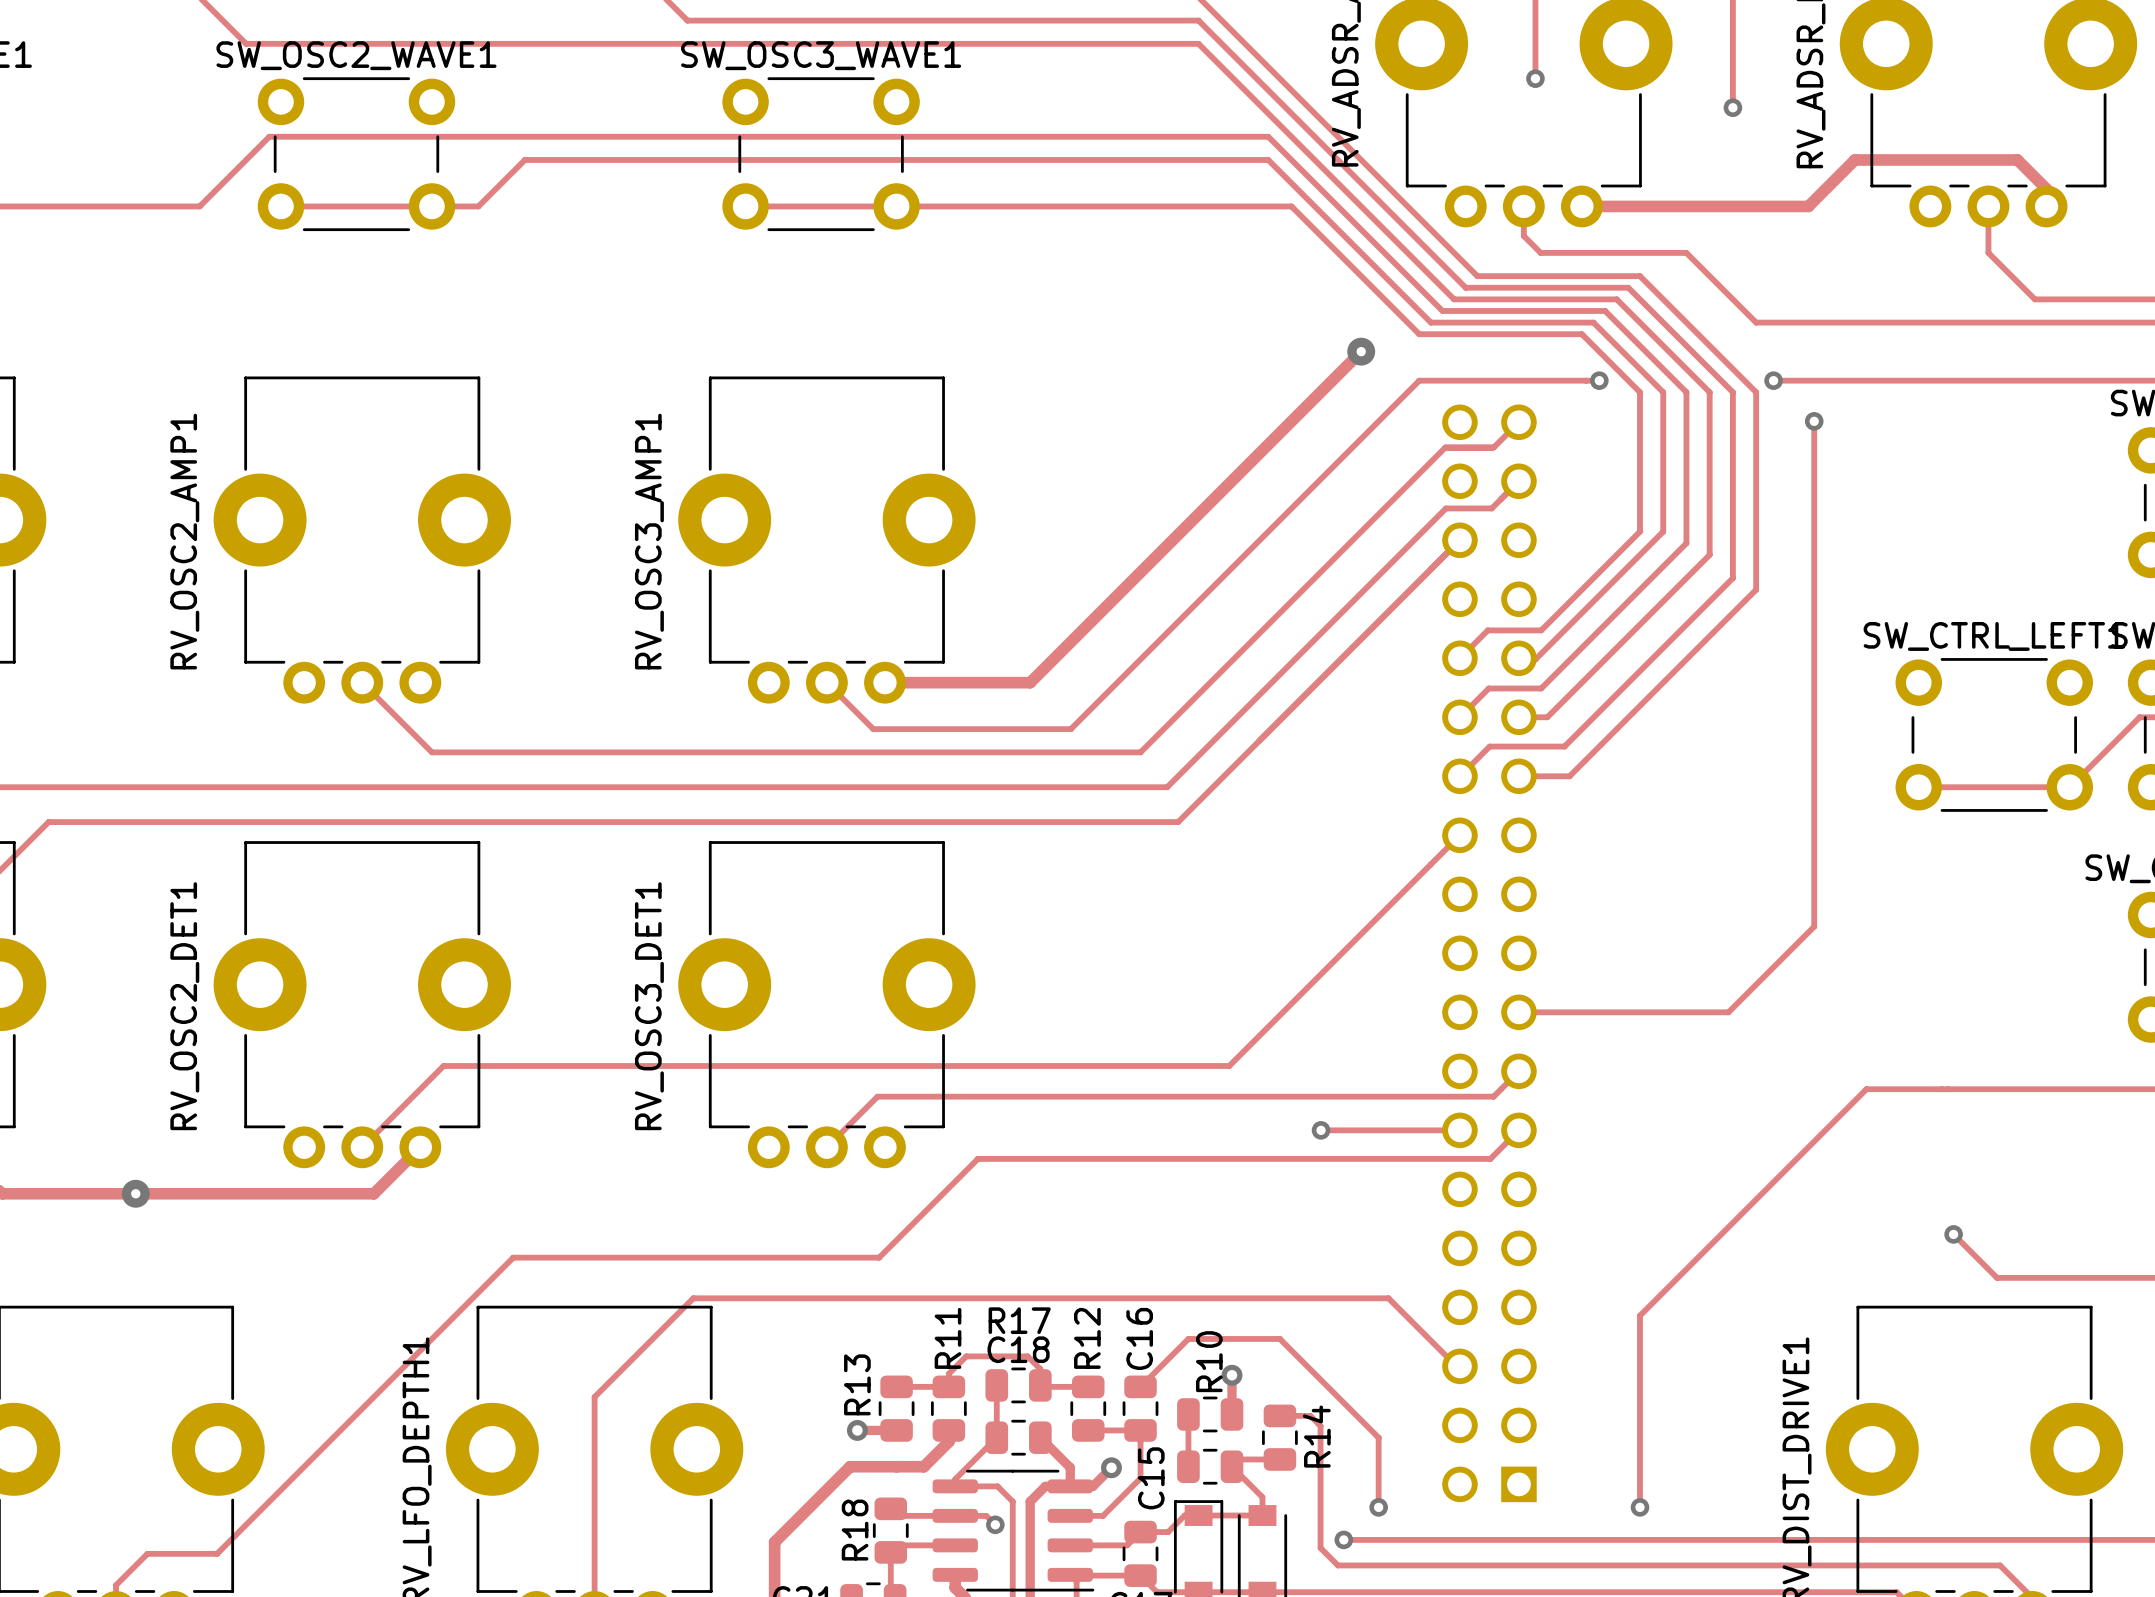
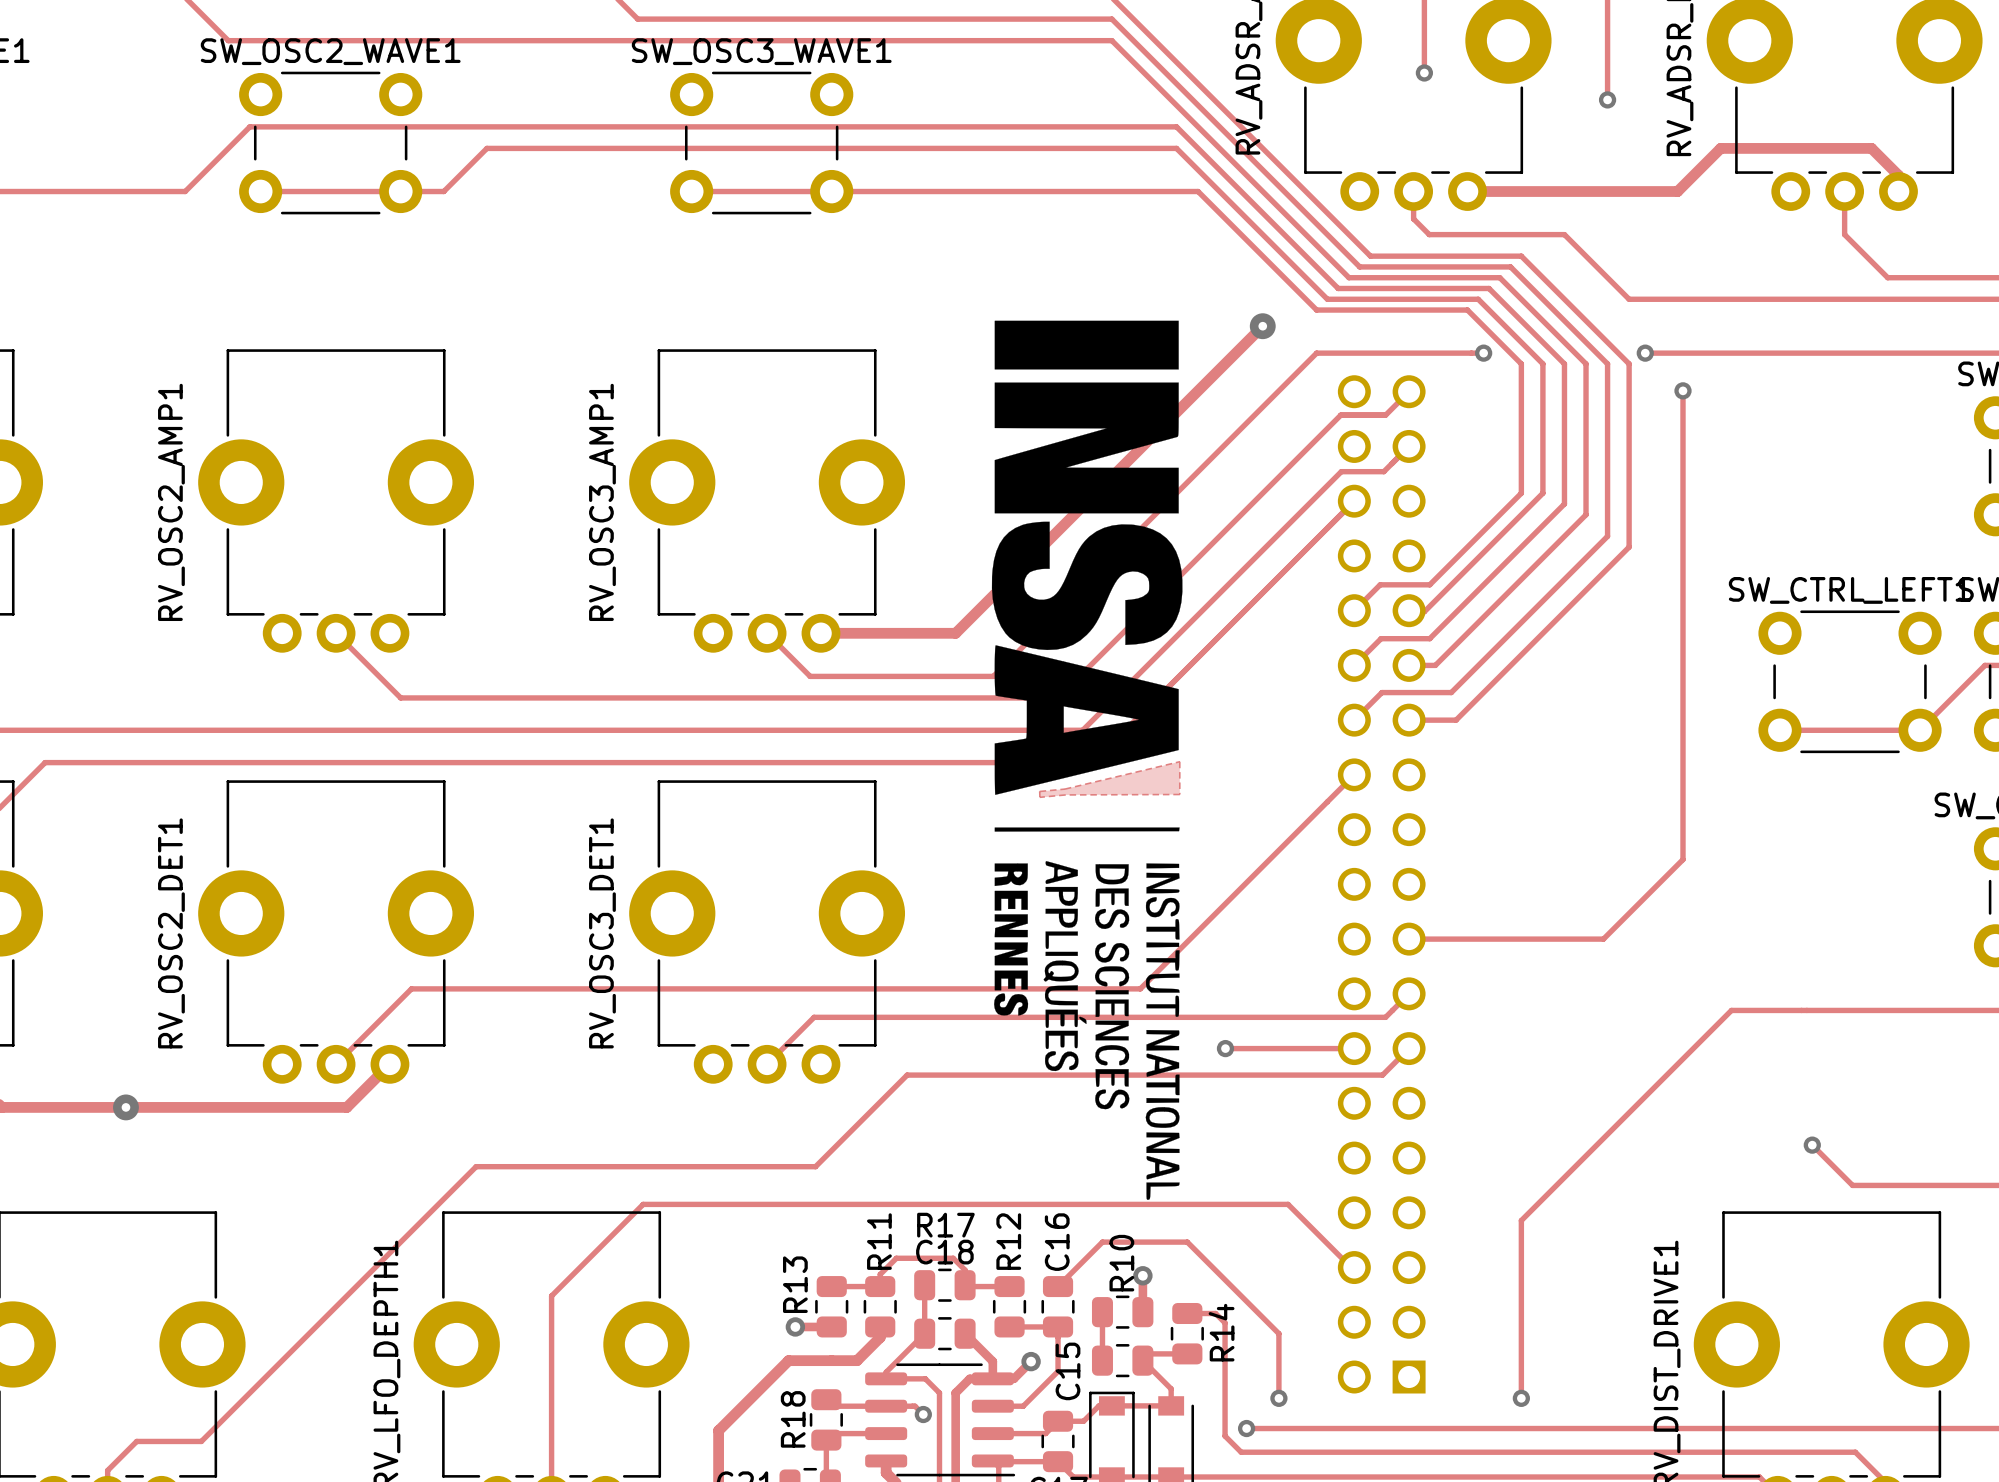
drawing: none -> [991, 320, 1183, 1200]
zone outline: none -> (1179, 761) (1064, 789) (1039, 791) (1039, 797) (1065, 794) (1179, 794) (1179, 761)

